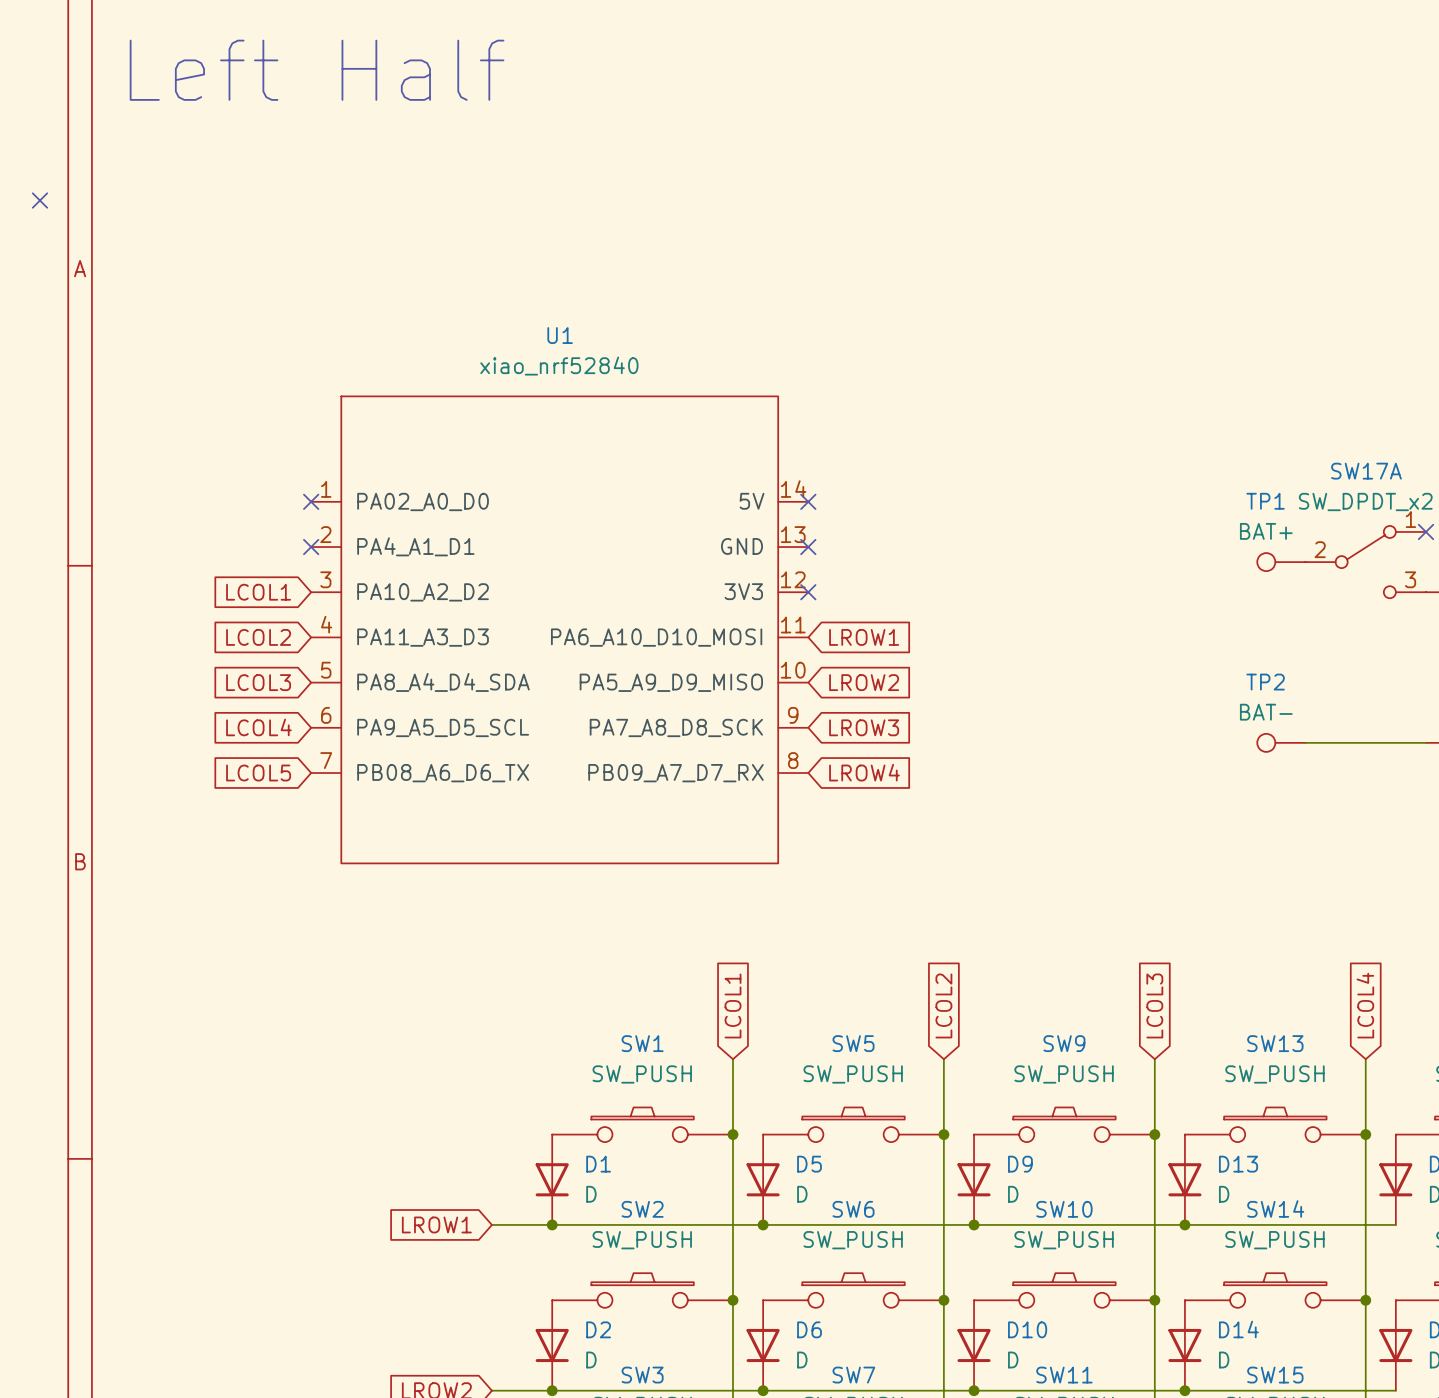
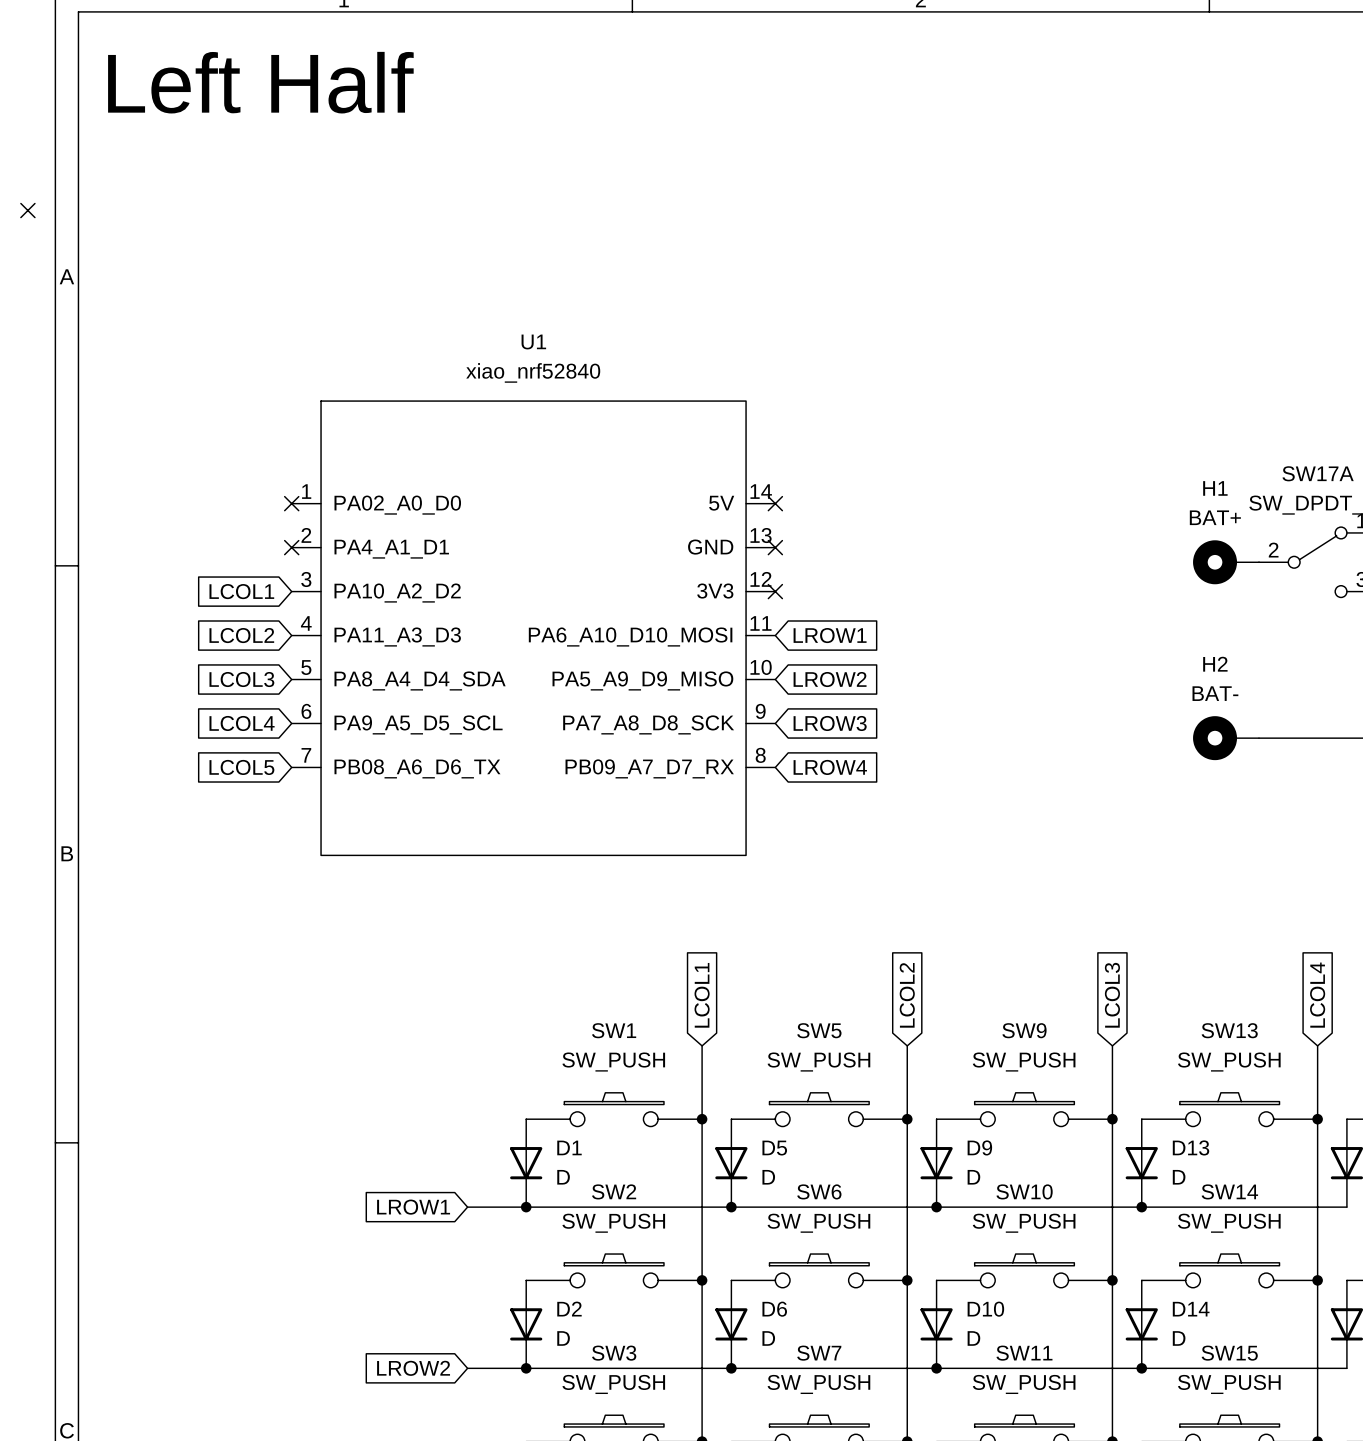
H1: none -> BAT+ (1226, 562)
TP1: BAT+ (1281, 562) -> none
H2: none -> BAT- (1226, 738)
TP2: BAT- (1281, 742) -> none

